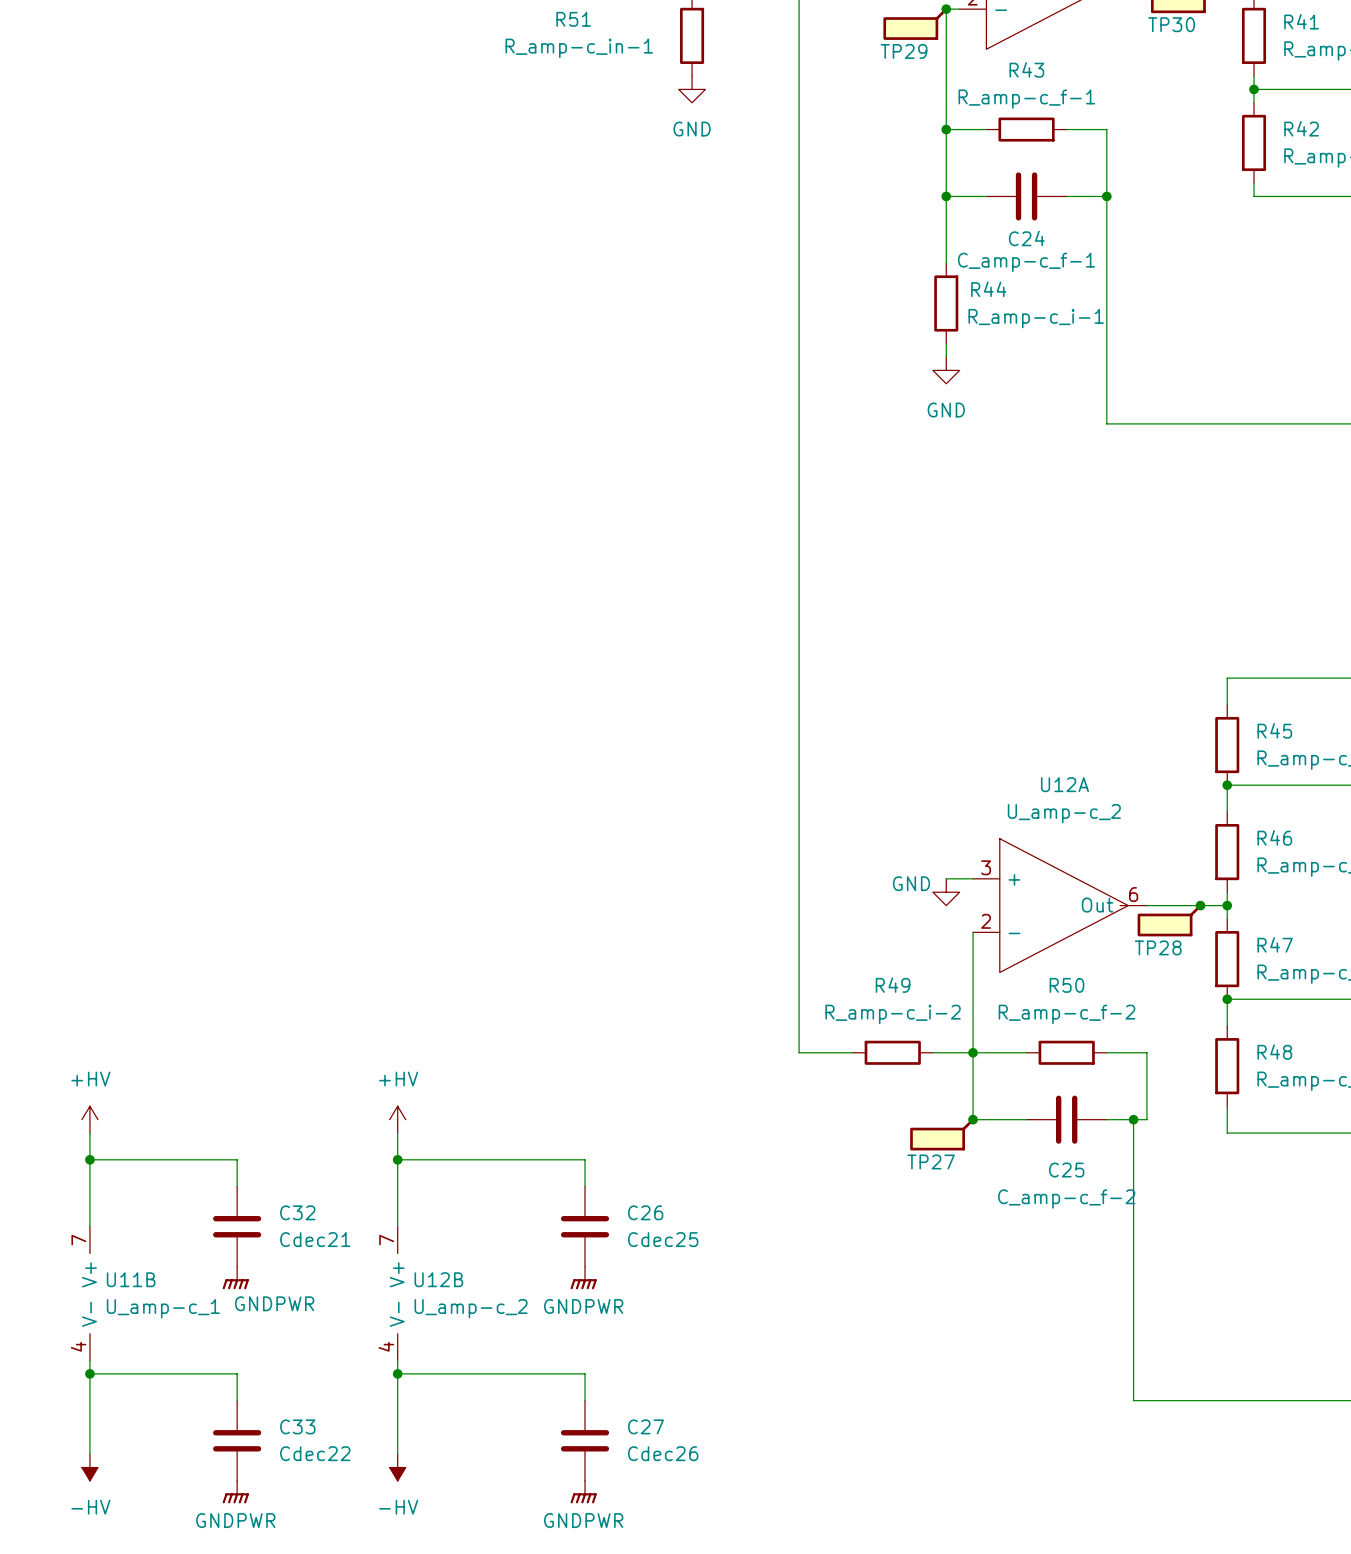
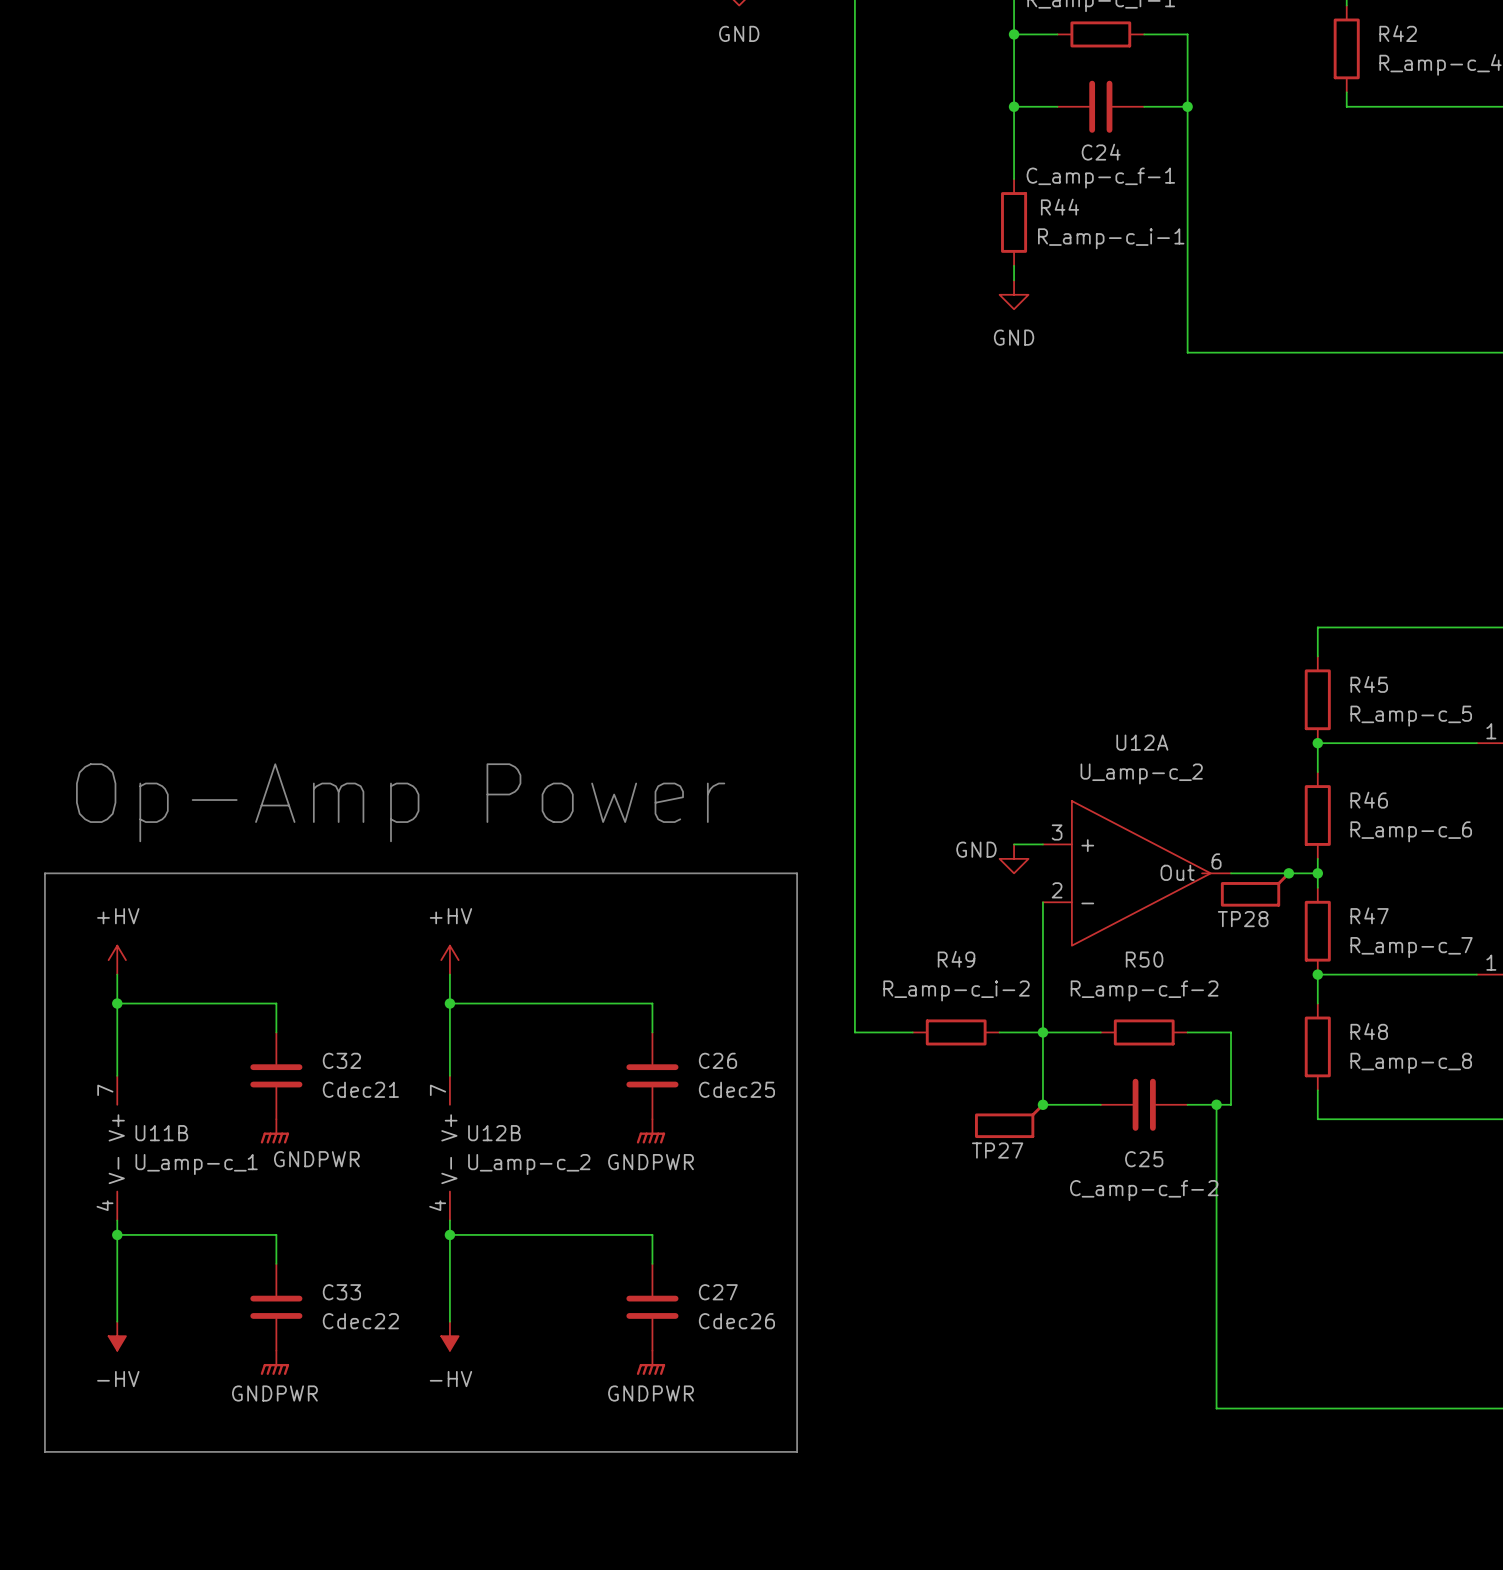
text: none -> Op-Amp Power (400, 802)
line: none -> (44, 873) (797, 873) (797, 1451) (44, 1451) (44, 873)
junction: none -> (117, 1003)
junction: none -> (449, 1003)
power symbol position: +HV (89, 1119) -> +HV (117, 960)
power symbol position: +HV (397, 1119) -> +HV (449, 960)
wire: (89, 1133) (89, 1226) -> (117, 974) (117, 1075)
wire: (397, 1133) (397, 1226) -> (449, 974) (449, 1075)
power symbol: none -> GNDPWR (274, 1131)
power symbol: none -> GNDPWR (651, 1131)
wire: (89, 1159) (237, 1159) (237, 1186) -> (117, 1003) (276, 1003) (276, 1032)
junction: (89, 1159) -> none
wire: (397, 1159) (585, 1159) (585, 1186) -> (449, 1003) (652, 1003) (652, 1032)
junction: (397, 1159) -> none
C32 position: (237, 1226) -> (276, 1075)
C26 position: (585, 1226) -> (652, 1075)
junction: none -> (117, 1234)
junction: none -> (449, 1234)
power symbol: GNDPWR (235, 1278) -> none
power symbol: GNDPWR (583, 1278) -> none
U11B position: (89, 1293) -> (117, 1148)
U12B position: (397, 1293) -> (449, 1148)
power symbol: none -> GNDPWR (274, 1362)
power symbol: none -> GNDPWR (651, 1362)
wire: (89, 1360) (89, 1454) -> (117, 1220) (117, 1321)
wire: (397, 1360) (397, 1454) -> (449, 1220) (449, 1321)
wire: (89, 1373) (237, 1373) (237, 1400) -> (117, 1234) (276, 1234) (276, 1263)
junction: (89, 1373) -> none
wire: (397, 1373) (585, 1373) (585, 1400) -> (449, 1234) (652, 1234) (652, 1263)
junction: (397, 1373) -> none
C33 position: (237, 1440) -> (276, 1307)
C27 position: (585, 1440) -> (652, 1307)
power symbol position: -HV (89, 1467) -> -HV (117, 1336)
power symbol position: -HV (397, 1467) -> -HV (449, 1336)
power symbol: GNDPWR (235, 1492) -> none
power symbol: GNDPWR (583, 1492) -> none

